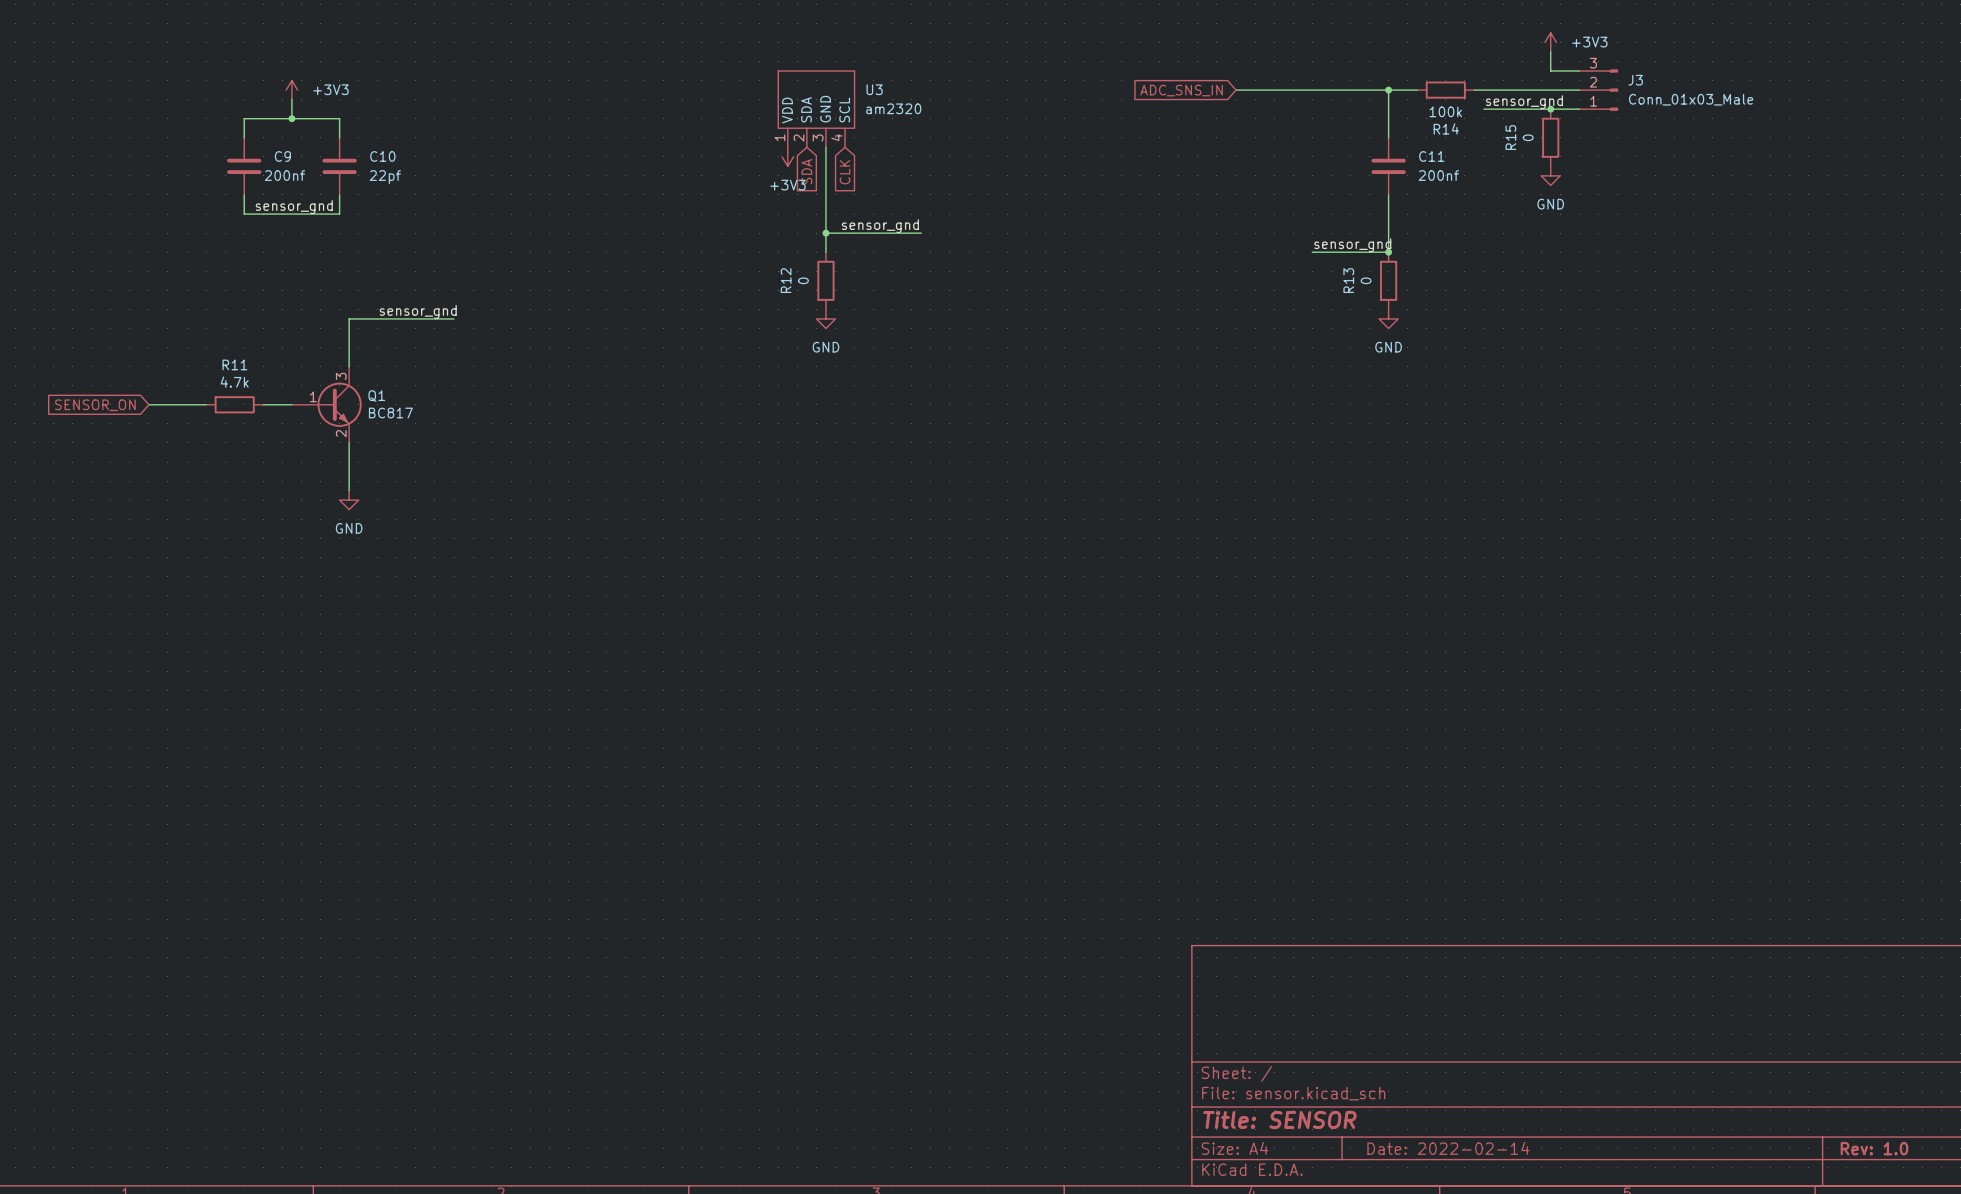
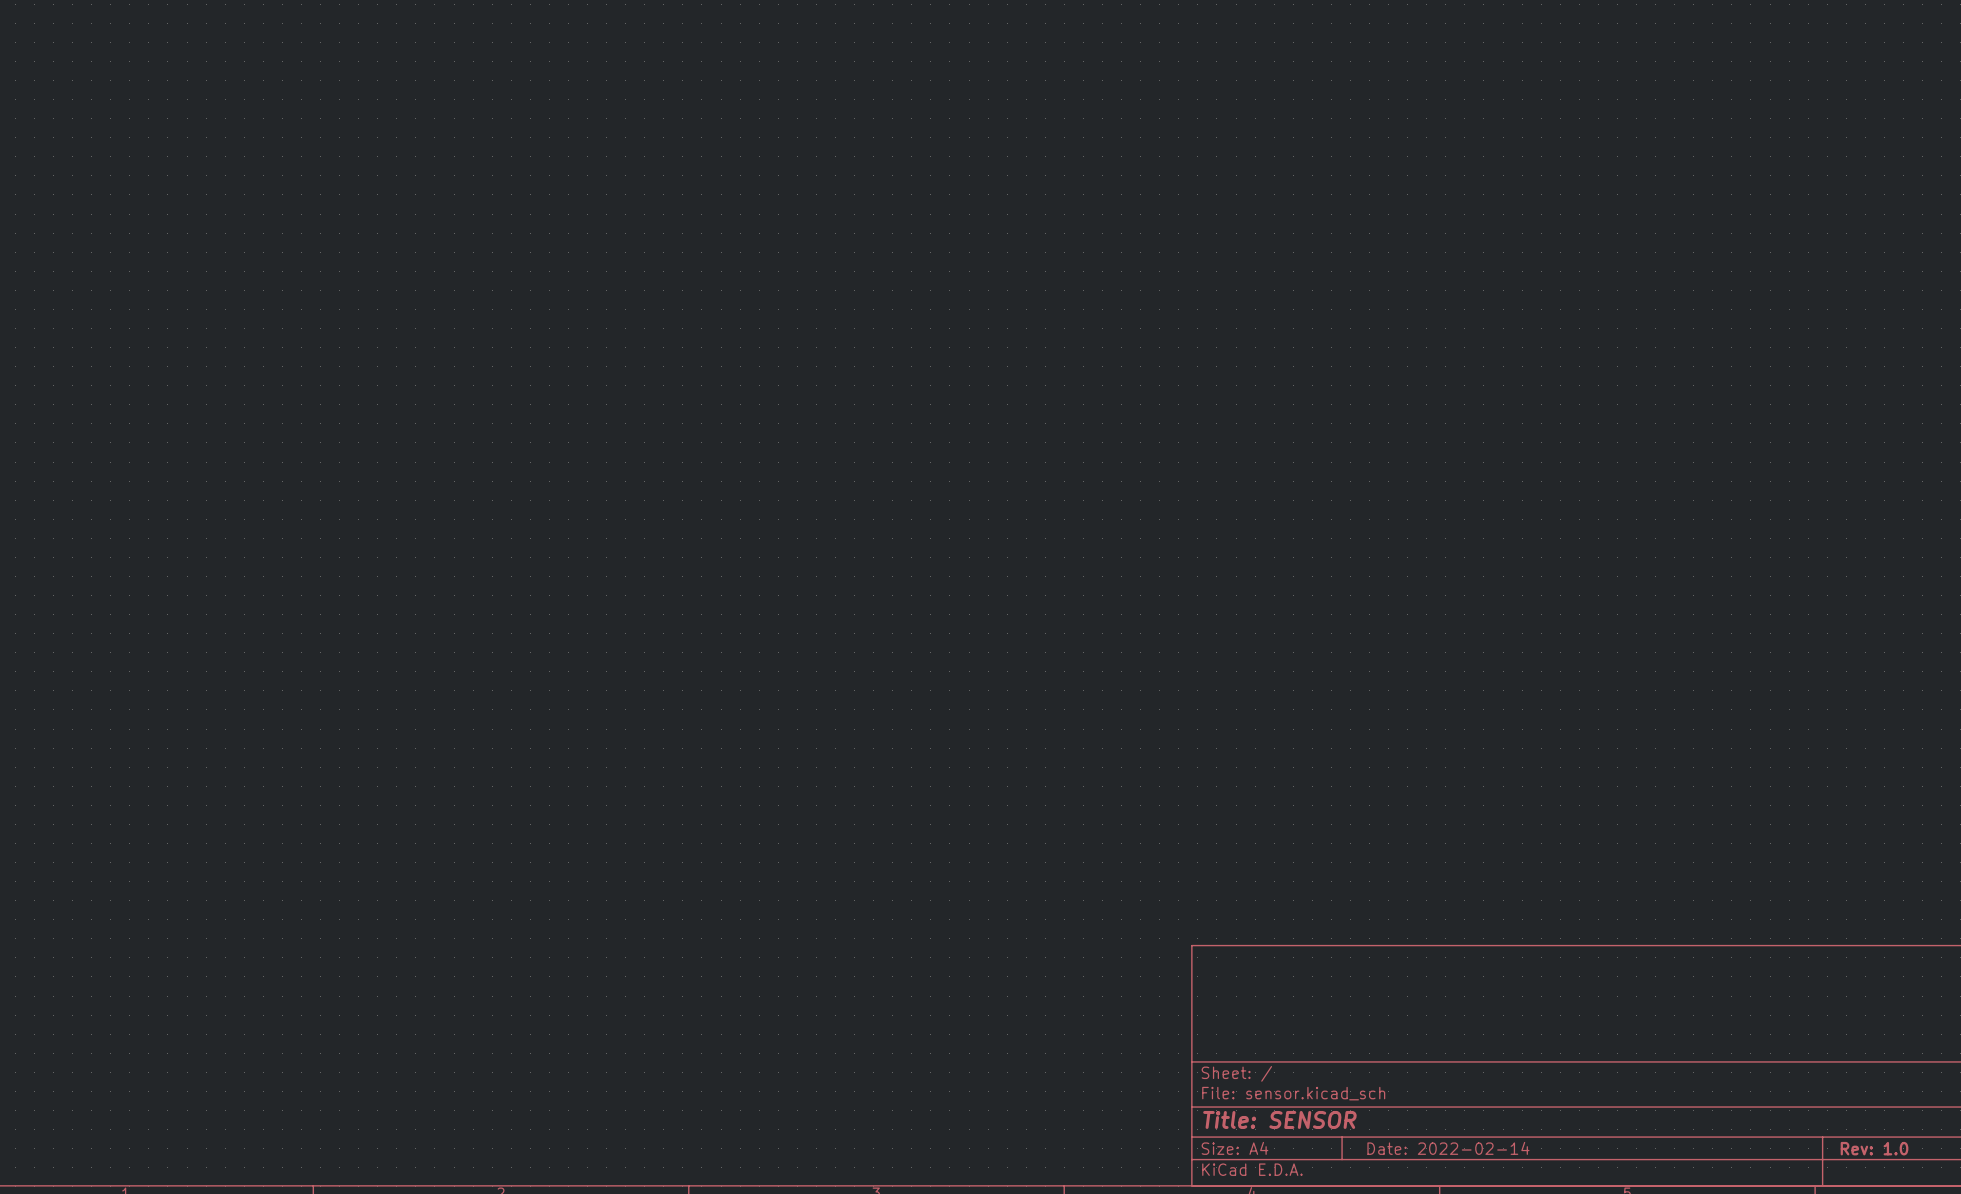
power symbol: +3V3 (1550, 42) -> none
wire: (1550, 51) (1550, 71) (1579, 71) -> none
power symbol: +3V3 (291, 90) -> none
global label: ADC_SNS_IN (1181, 90) -> none
wire: (1236, 90) (1417, 90) -> none
wire: (1388, 90) (1388, 137) -> none
junction: (1388, 90) -> none
R14: 100k (1445, 90) -> none
wire: (1474, 90) (1579, 90) -> none
J3: Conn_01x03_Male (1598, 90) -> none
wire: (291, 99) (291, 118) -> none
label: sensor_gnd (1524, 102) -> none
U3: am2320 (816, 109) -> none
wire: (1483, 109) (1579, 109) -> none
junction: (1550, 109) -> none
junction: (291, 118) -> none
wire: (244, 137) (244, 118) (339, 118) (339, 137) -> none
R15: 0 (1550, 137) -> none
wire: (825, 147) (825, 252) -> none
power symbol: +3V3 (787, 156) -> none
C9: 200nf (244, 166) -> none
C10: 22pf (339, 166) -> none
C11: 200nf (1388, 166) -> none
global label: SDA (806, 171) -> none
global label: CLK (845, 172) -> none
power symbol: GND (1550, 175) -> none
wire: (244, 194) (244, 214) (339, 214) (339, 194) -> none
wire: (1388, 194) (1388, 252) (1312, 252) -> none
label: sensor_gnd (294, 207) -> none
label: sensor_gnd (880, 226) -> none
wire: (825, 233) (921, 233) -> none
junction: (825, 233) -> none
label: sensor_gnd (1352, 245) -> none
junction: (1388, 252) -> none
R12: 0 (825, 280) -> none
R13: 0 (1388, 280) -> none
label: sensor_gnd (418, 312) -> none
wire: (454, 318) (349, 318) (349, 366) -> none
power symbol: GND (825, 318) -> none
power symbol: GND (1388, 318) -> none
wire: (148, 404) (206, 404) -> none
R11: 4.7k (234, 404) -> none
wire: (263, 404) (291, 404) -> none
Q1: BC817 (326, 404) -> none
global label: SENSOR_ON (95, 405) -> none
wire: (349, 442) (349, 490) -> none
power symbol: GND (349, 500) -> none

